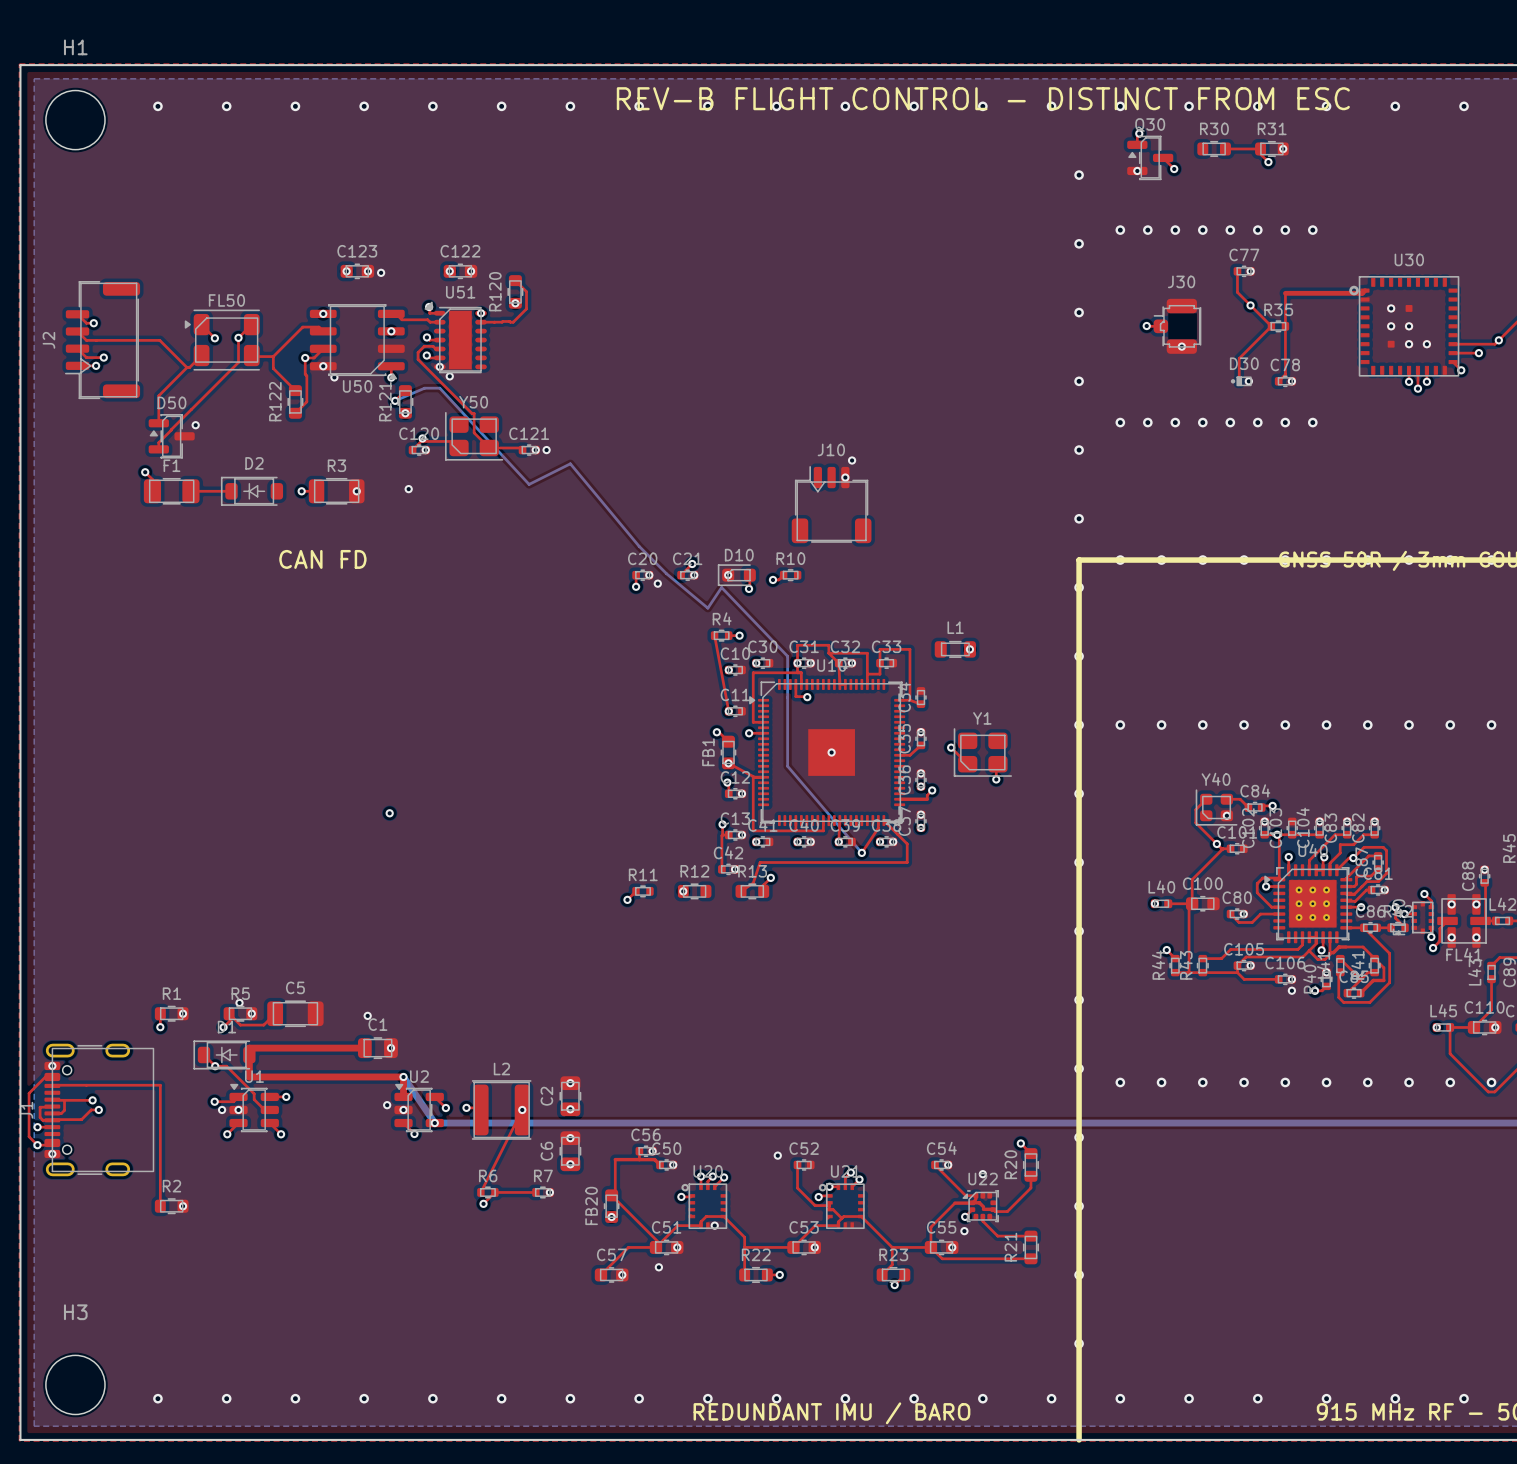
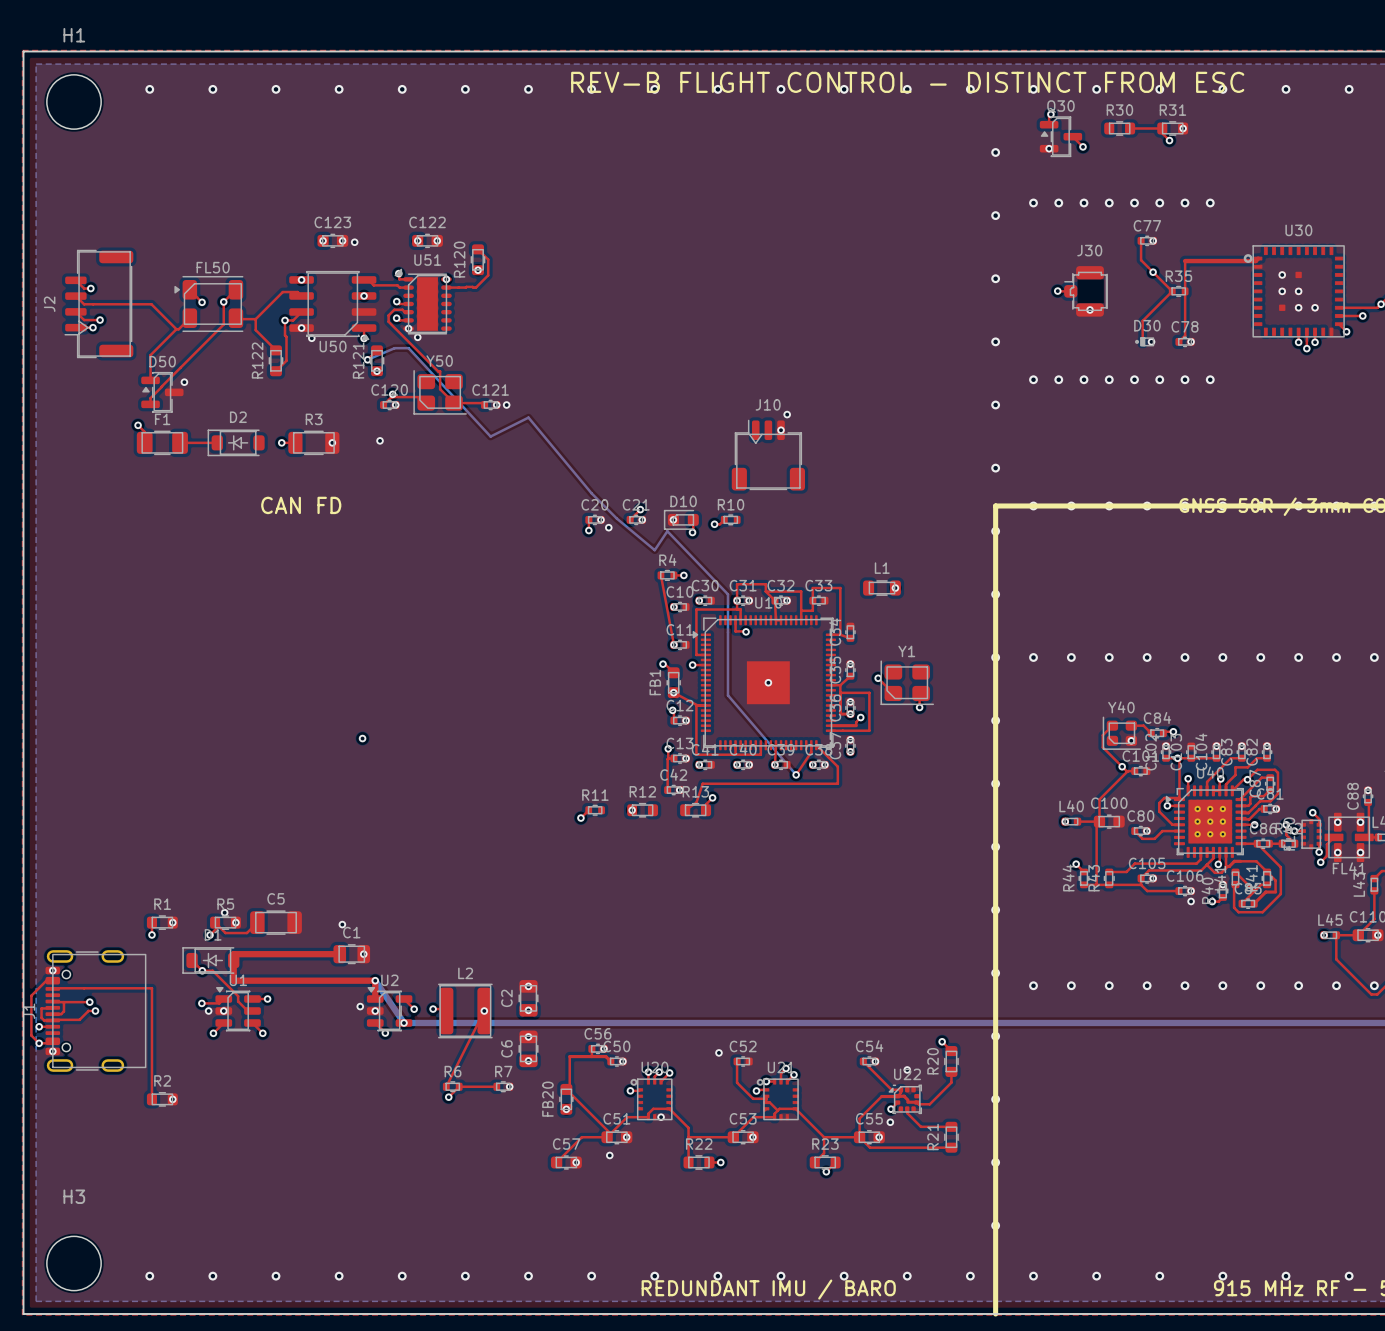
top track: none -> (840, 685) (840, 714) (850, 714)
top track: none -> (840, 692) (869, 692) (869, 730) (830, 730)

